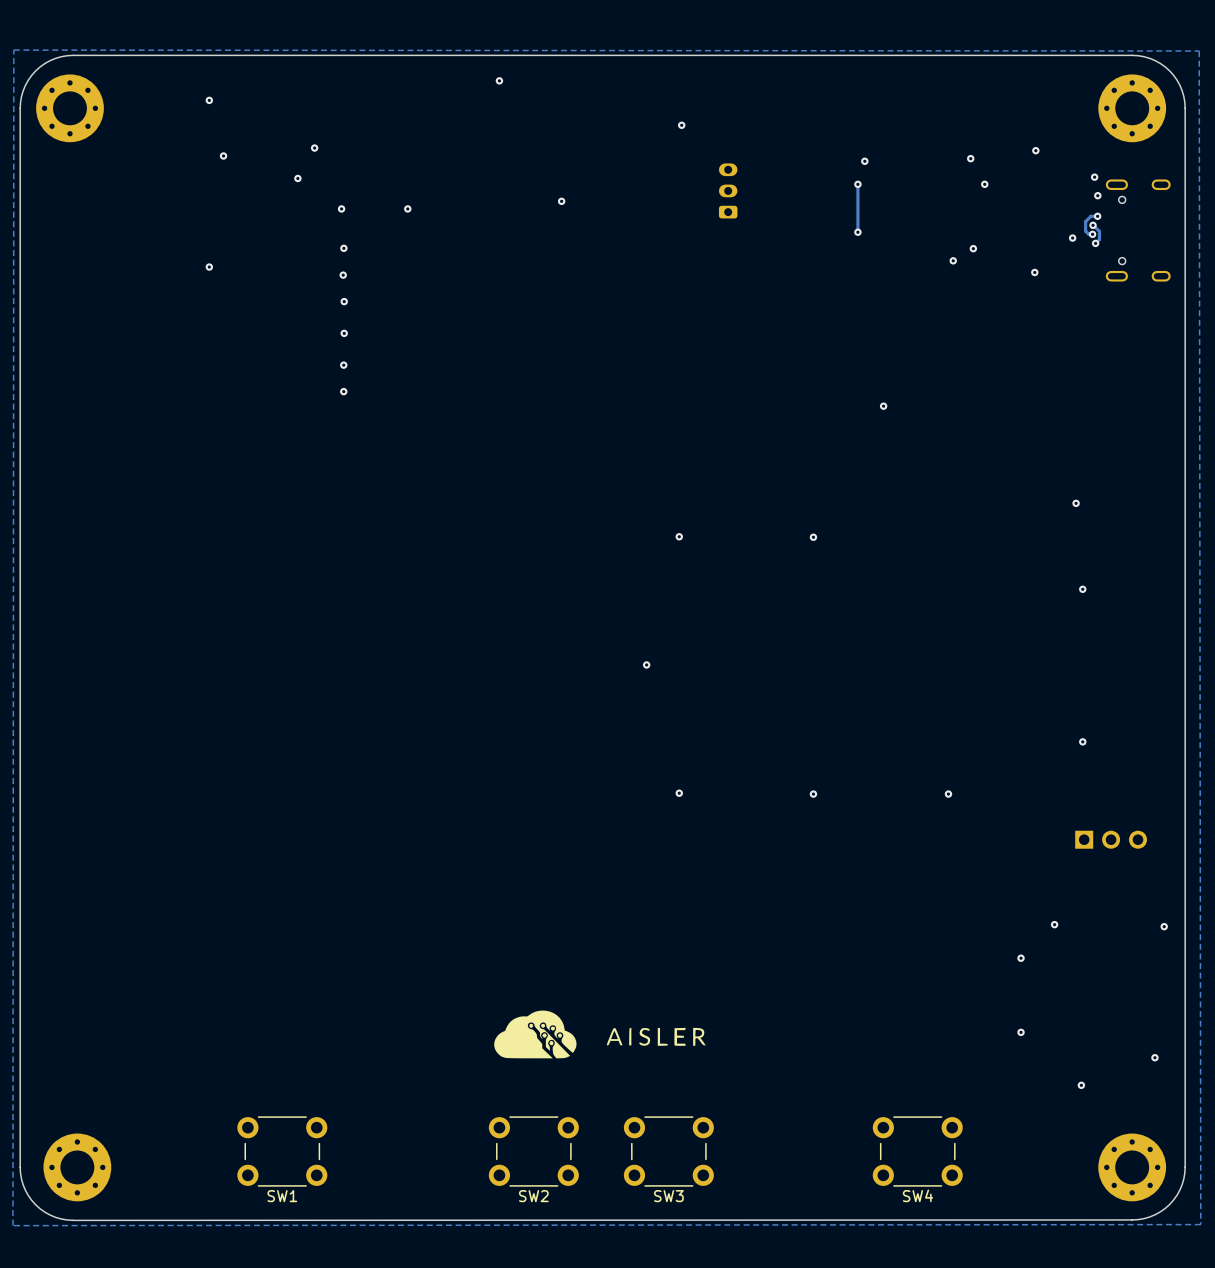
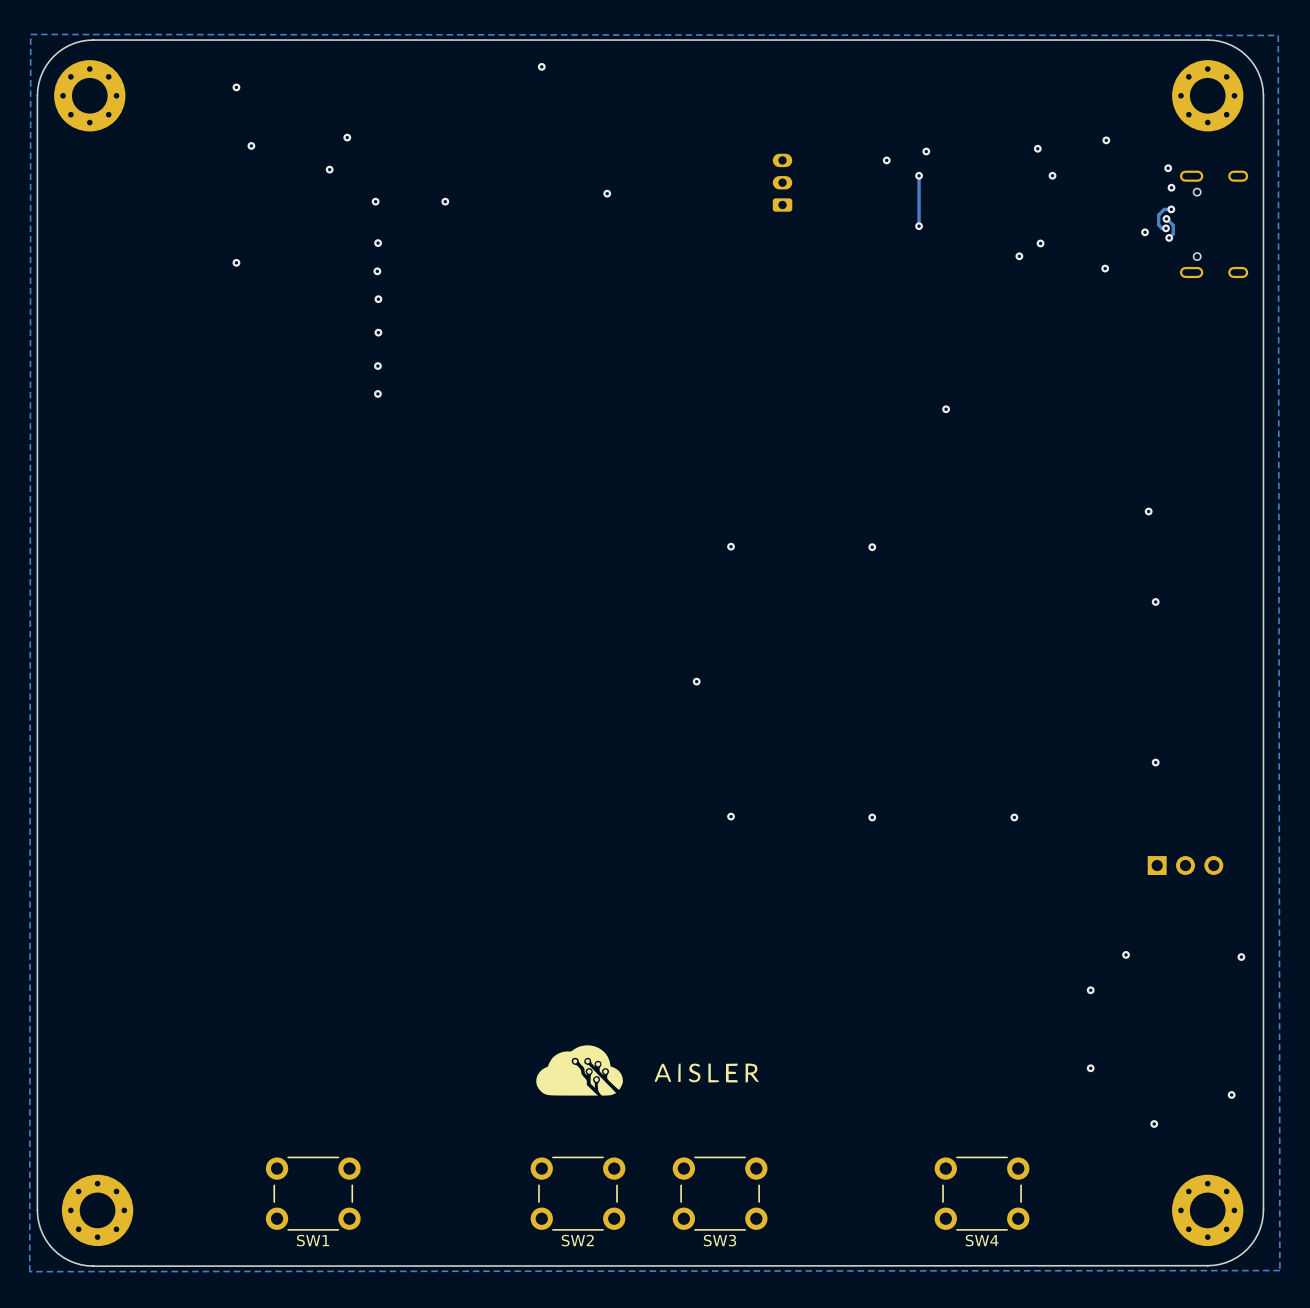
via: (681, 125) -> none
via: none -> (886, 160)

